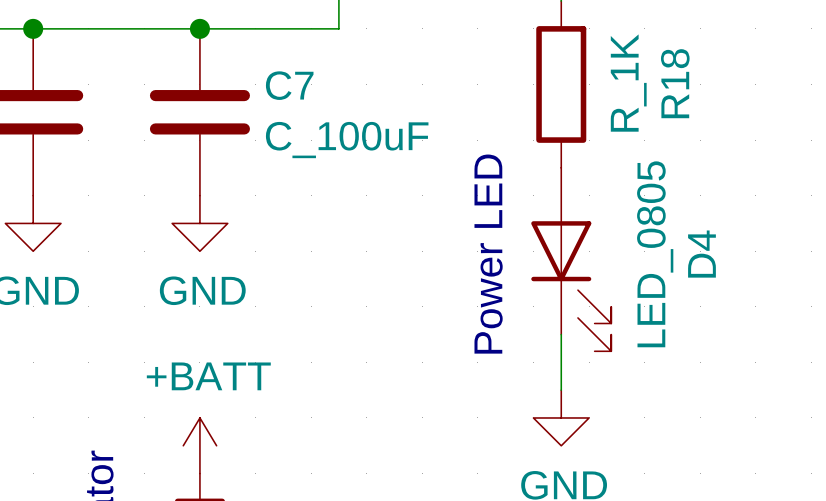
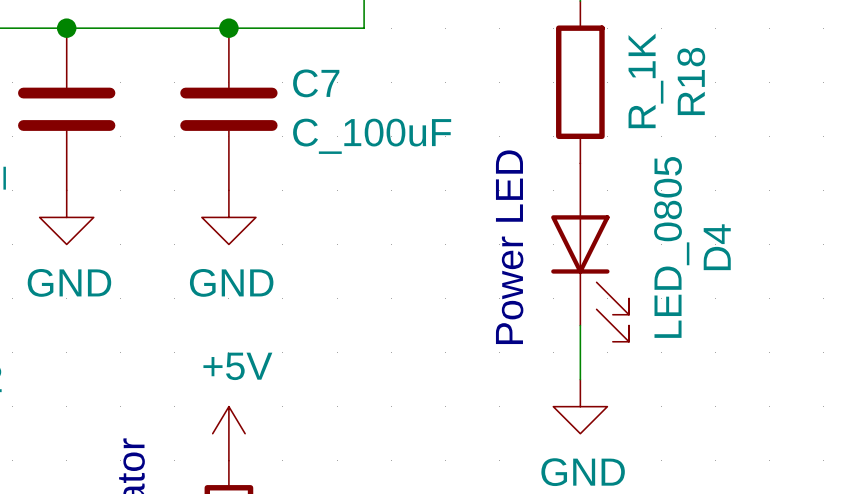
power symbol: +BATT (199, 445) -> +5V (228, 433)

